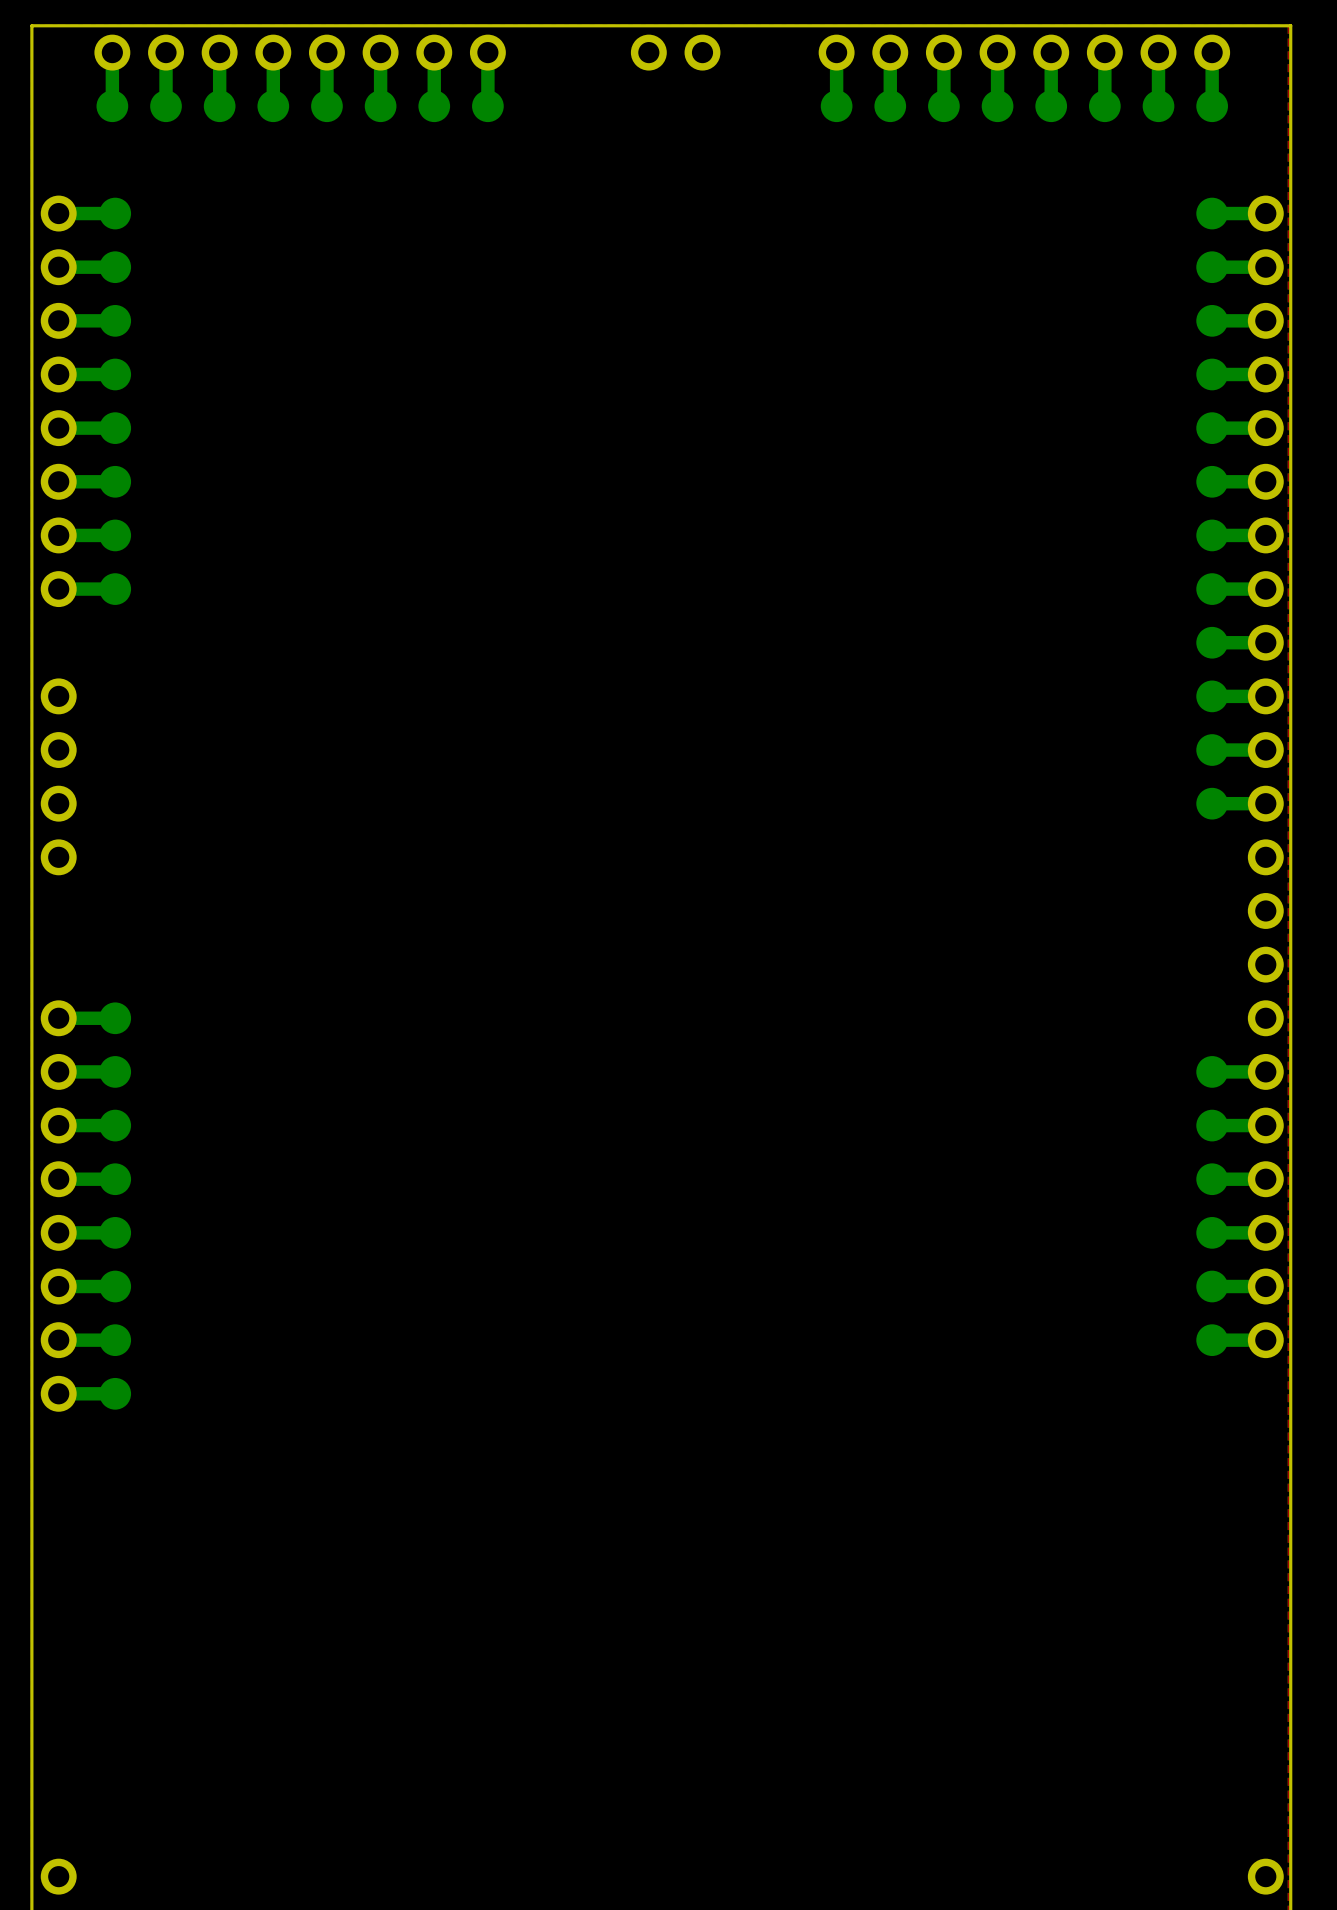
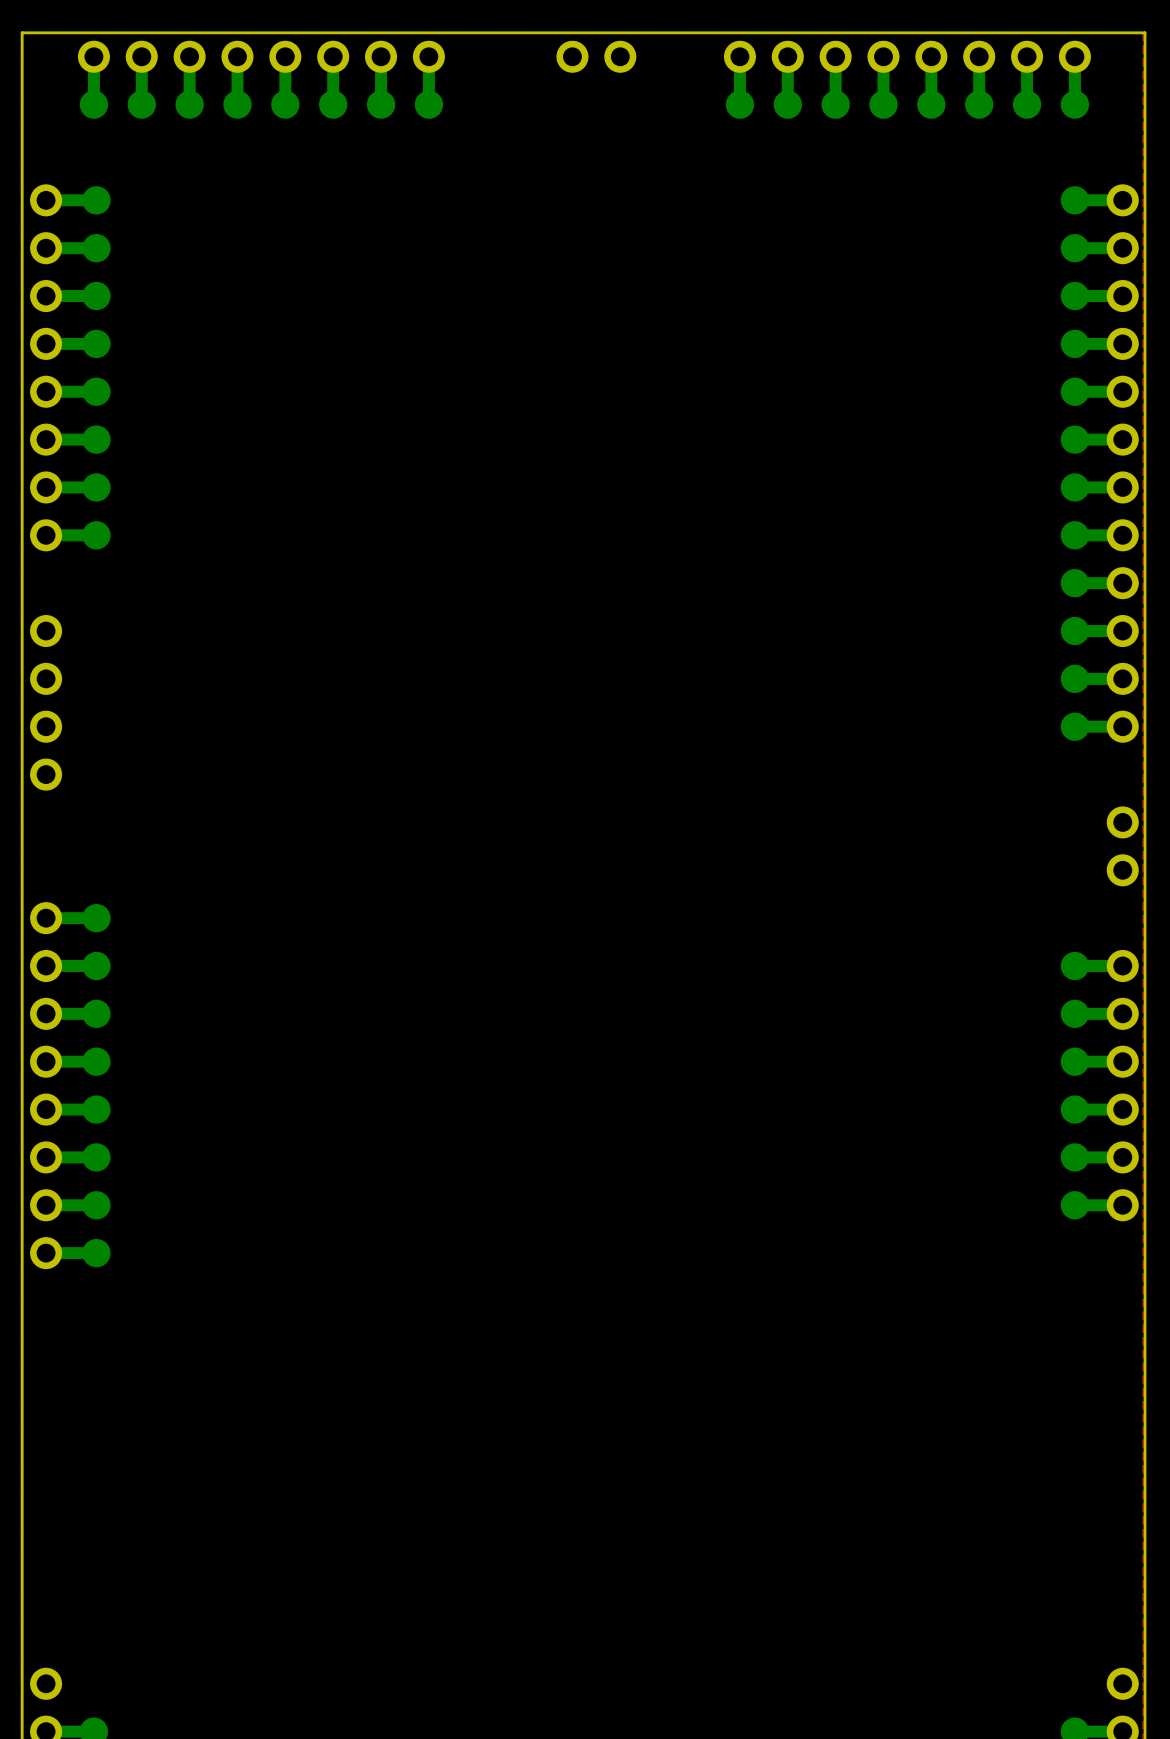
part footprint: [1247, 839, 1284, 1037] -> [1106, 806, 1139, 887]

